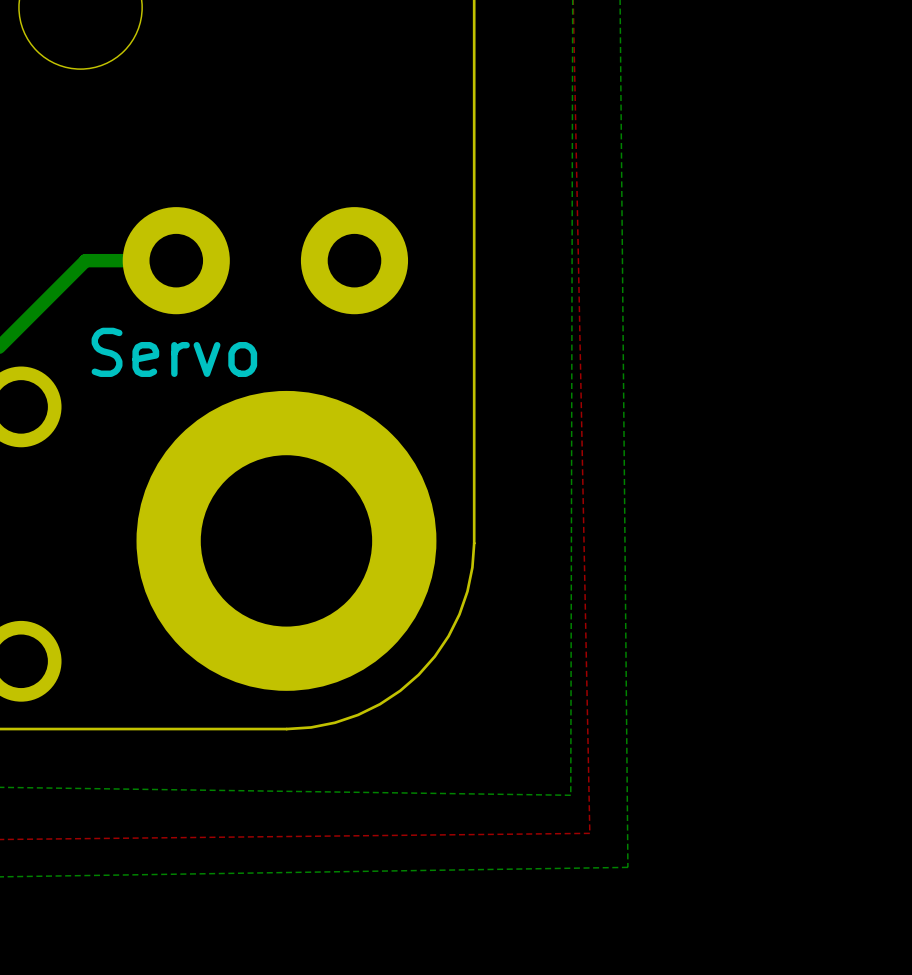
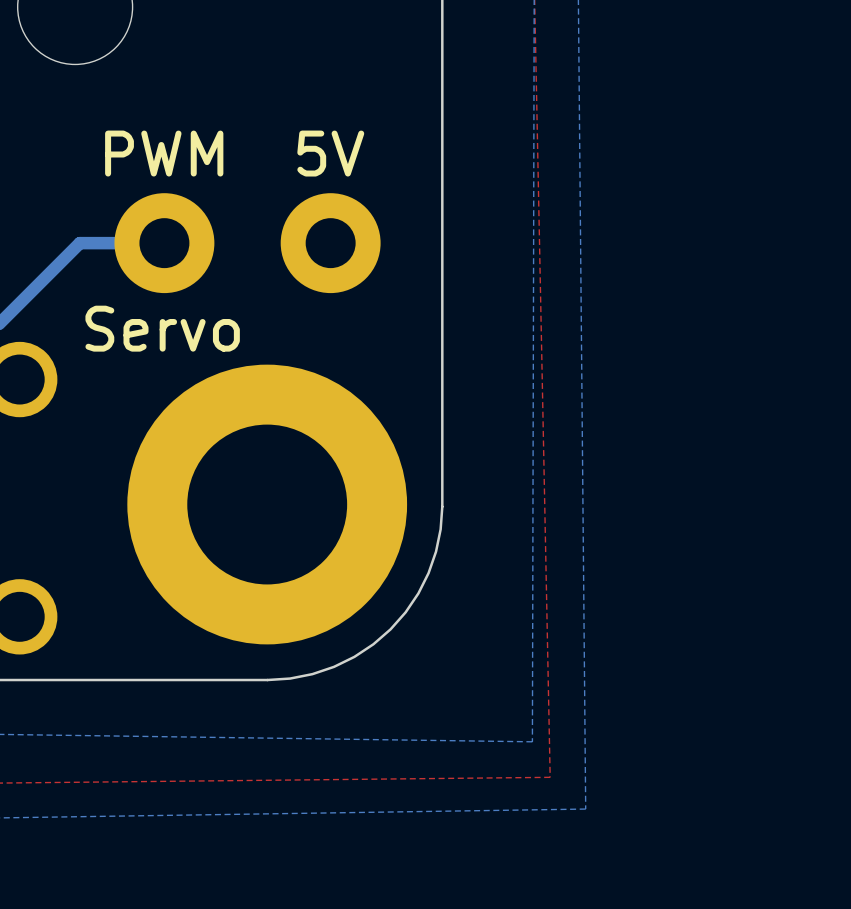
text: none -> PWM (164, 153)
text: none -> 5V (330, 153)

